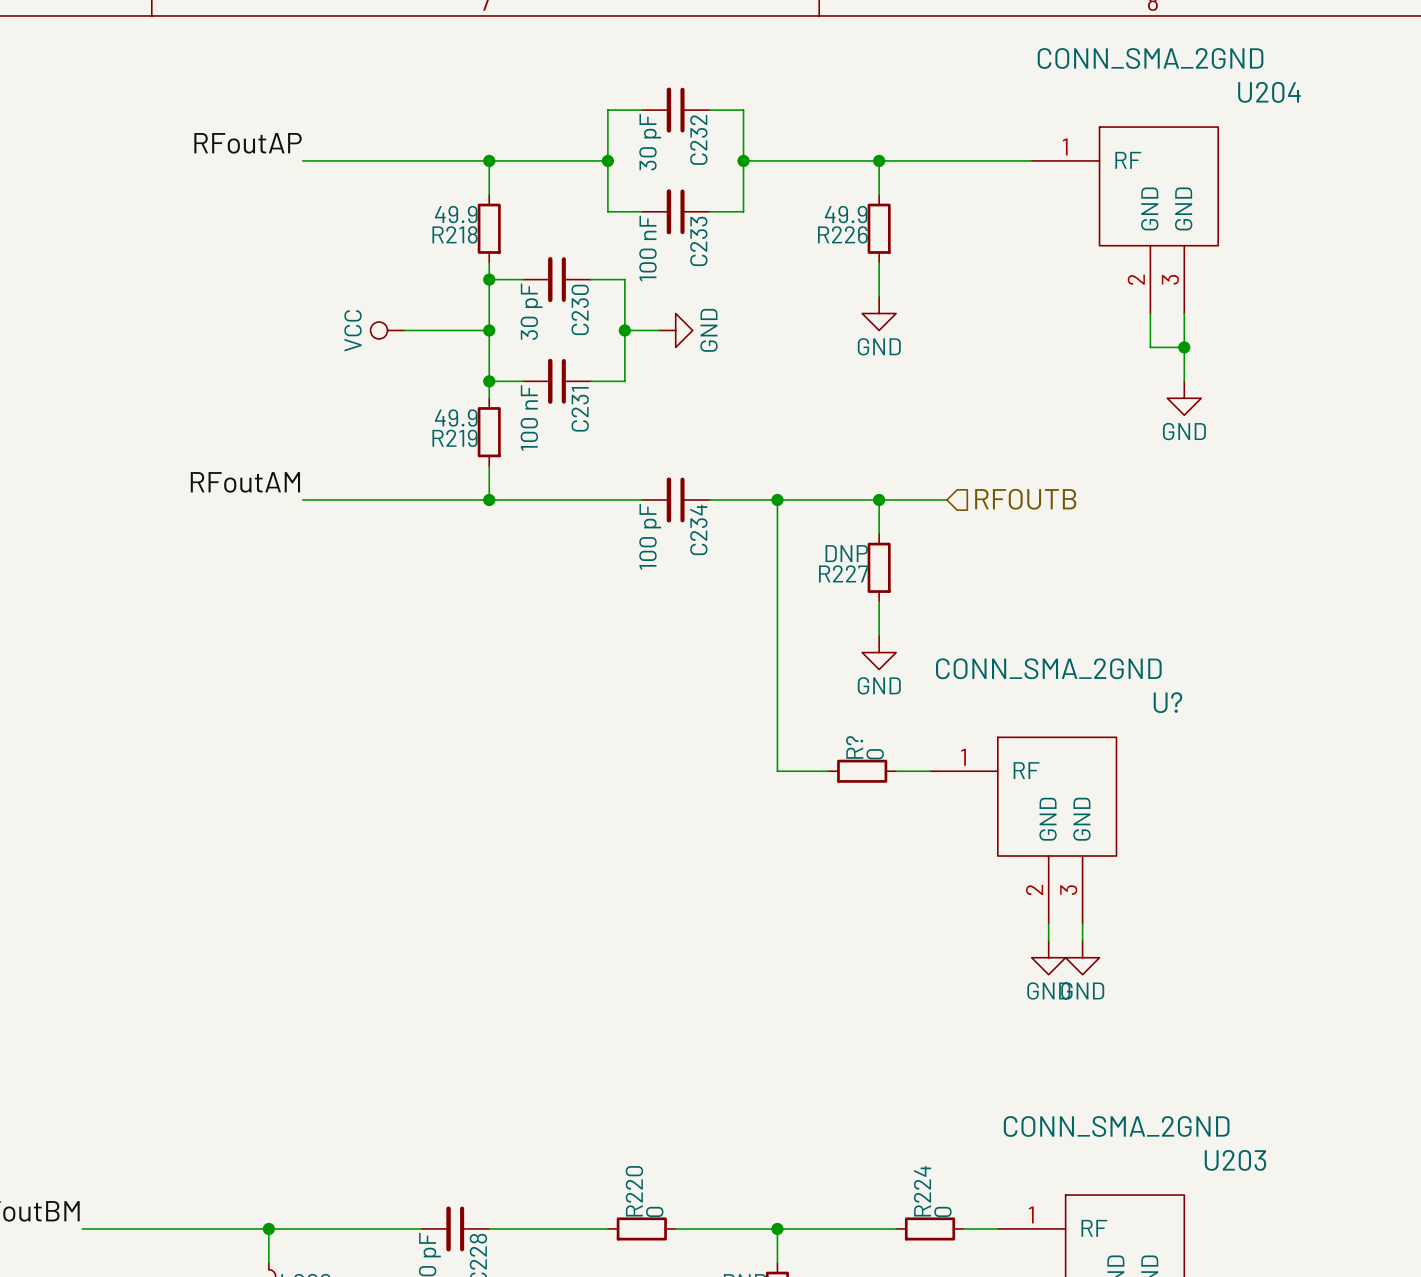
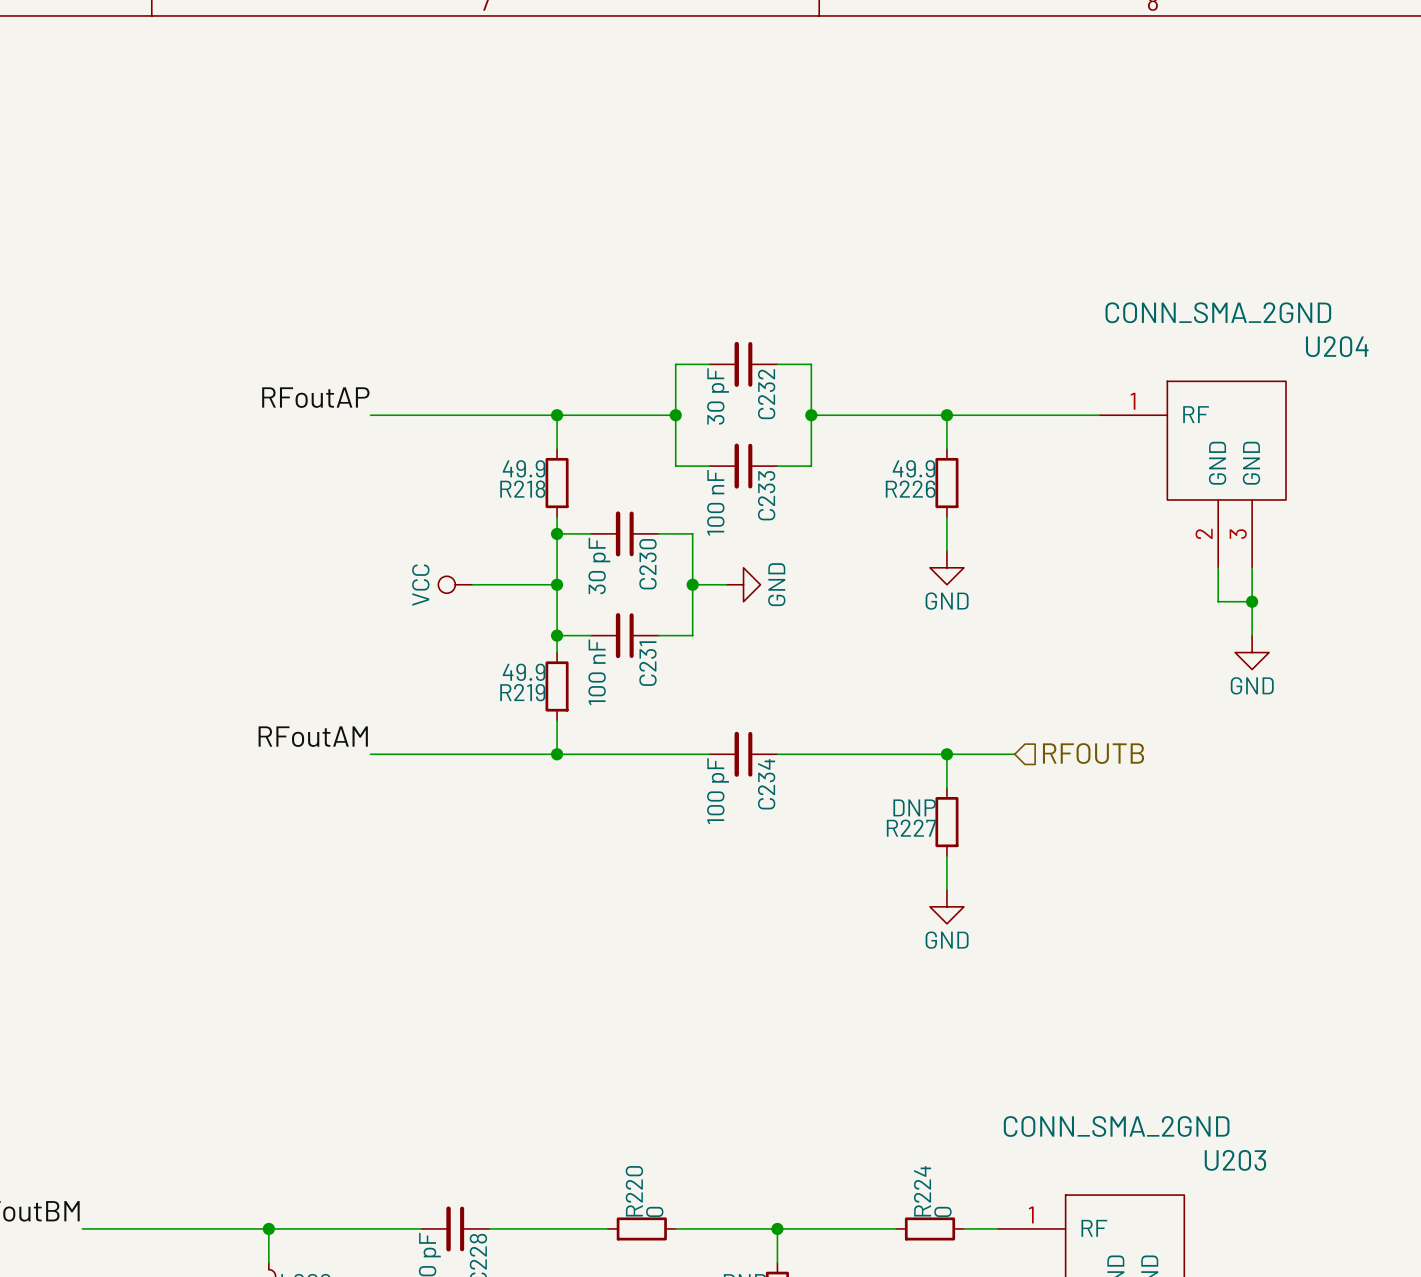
wire: (641, 110) (607, 110) (607, 211) (641, 211) -> (709, 364) (675, 364) (675, 466) (709, 466)
C232 position: (675, 110) -> (743, 364)
wire: (709, 110) (743, 110) (743, 211) (709, 211) -> (777, 364) (811, 364) (811, 466) (777, 466)
label position: RFoutAP (248, 143) -> RFoutAP (315, 397)
wire: (302, 160) (607, 160) -> (370, 415) (675, 415)
wire: (489, 160) (489, 194) -> (557, 415) (557, 449)
junction: (489, 160) -> none
junction: (607, 160) -> none
wire: (743, 160) (1031, 160) -> (811, 415) (1099, 415)
junction: (743, 160) -> none
wire: (879, 160) (879, 194) -> (946, 415) (946, 449)
junction: (879, 160) -> none
C233 position: (675, 211) -> (743, 466)
U204 position: (1124, 220) -> (1192, 474)
R218 position: (489, 228) -> (557, 483)
R226 position: (879, 228) -> (946, 483)
wire: (489, 262) (489, 398) -> (557, 516) (557, 652)
wire: (879, 262) (879, 296) -> (946, 516) (946, 550)
wire: (489, 279) (523, 279) -> (557, 533) (590, 533)
junction: (489, 279) -> none
C230 position: (557, 279) -> (624, 533)
wire: (590, 279) (624, 279) (624, 381) (590, 381) -> (658, 533) (692, 533) (692, 635) (658, 635)
power symbol: GND (879, 313) -> none
wire: (1150, 313) (1150, 347) (1184, 347) -> (1218, 567) (1218, 601) (1252, 601)
wire: (1184, 313) (1184, 381) -> (1252, 567) (1252, 635)
power symbol position: VCC (387, 330) -> VCC (455, 584)
wire: (404, 330) (489, 330) -> (472, 584) (557, 584)
junction: (489, 330) -> none
wire: (624, 330) (658, 330) -> (692, 584) (726, 584)
junction: (624, 330) -> none
power symbol: GND (675, 330) -> none
junction: (1184, 347) -> none
wire: (489, 381) (523, 381) -> (557, 635) (590, 635)
junction: (489, 381) -> none
C231 position: (557, 381) -> (624, 635)
power symbol: GND (1184, 398) -> none
junction: none -> (557, 415)
junction: none -> (675, 415)
junction: none -> (811, 415)
junction: none -> (946, 415)
R219 position: (489, 432) -> (557, 686)
wire: (489, 466) (489, 500) -> (557, 720) (557, 754)
label position: RFoutAM (245, 482) -> RFoutAM (313, 736)
hierarchical label position: RFOUTB (1025, 499) -> RFOUTB (1093, 753)
wire: (302, 500) (641, 500) -> (370, 754) (709, 754)
junction: (489, 500) -> none
C234 position: (675, 500) -> (743, 754)
wire: (709, 500) (946, 500) -> (777, 754) (1014, 754)
wire: (777, 500) (777, 771) (828, 771) -> none
junction: (777, 500) -> none
wire: (879, 500) (879, 533) -> (946, 754) (946, 788)
junction: (879, 500) -> none
junction: none -> (557, 533)
R227 position: (879, 567) -> (946, 822)
power symbol: none -> GND (946, 567)
junction: none -> (557, 584)
junction: none -> (692, 584)
power symbol: none -> GND (743, 584)
wire: (879, 601) (879, 635) -> (946, 856) (946, 889)
junction: none -> (1252, 601)
junction: none -> (557, 635)
power symbol: GND (879, 652) -> none
power symbol: none -> GND (1252, 652)
junction: none -> (557, 754)
junction: none -> (946, 754)
R?: 0 (862, 771) -> none
wire: (896, 771) (930, 771) -> none
U?: CONN_SMA_2GND (1023, 830) -> none
power symbol: none -> GND (946, 906)
wire: (1048, 923) (1048, 940) -> none
wire: (1082, 923) (1082, 940) -> none
power symbol: GND (1048, 957) -> none
power symbol: GND (1082, 957) -> none

